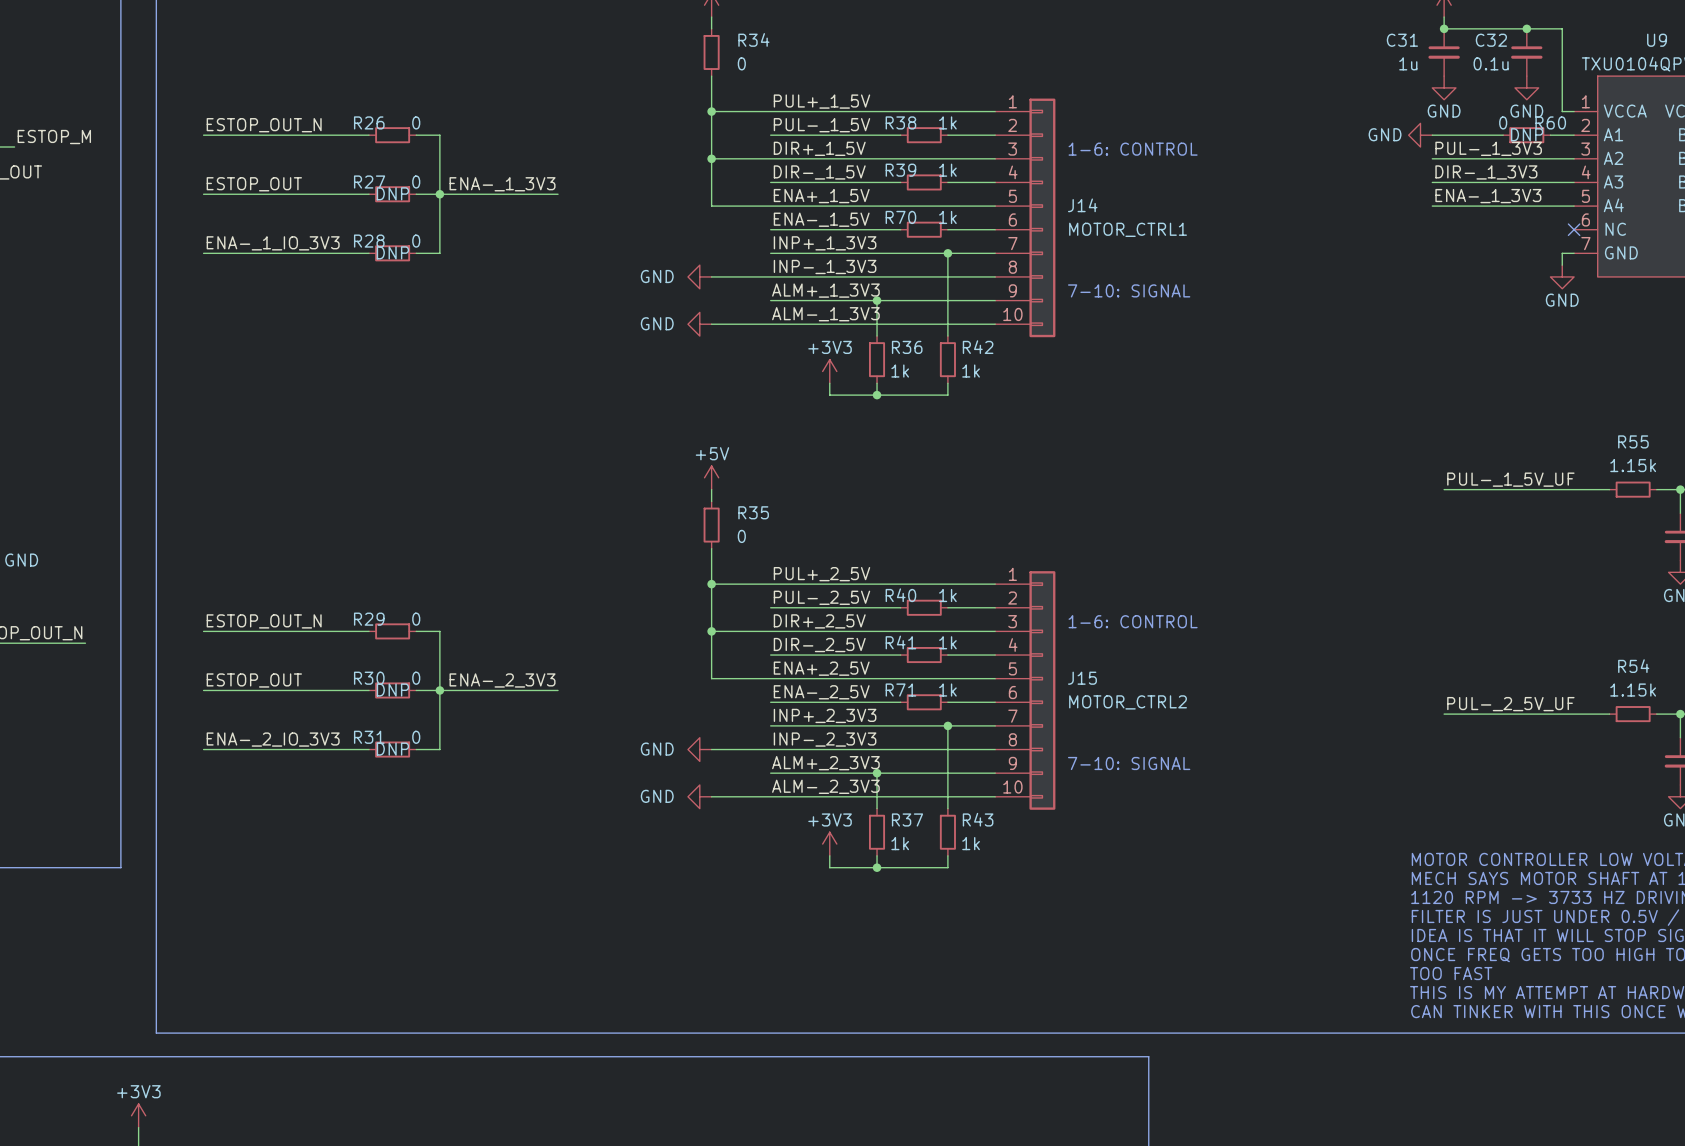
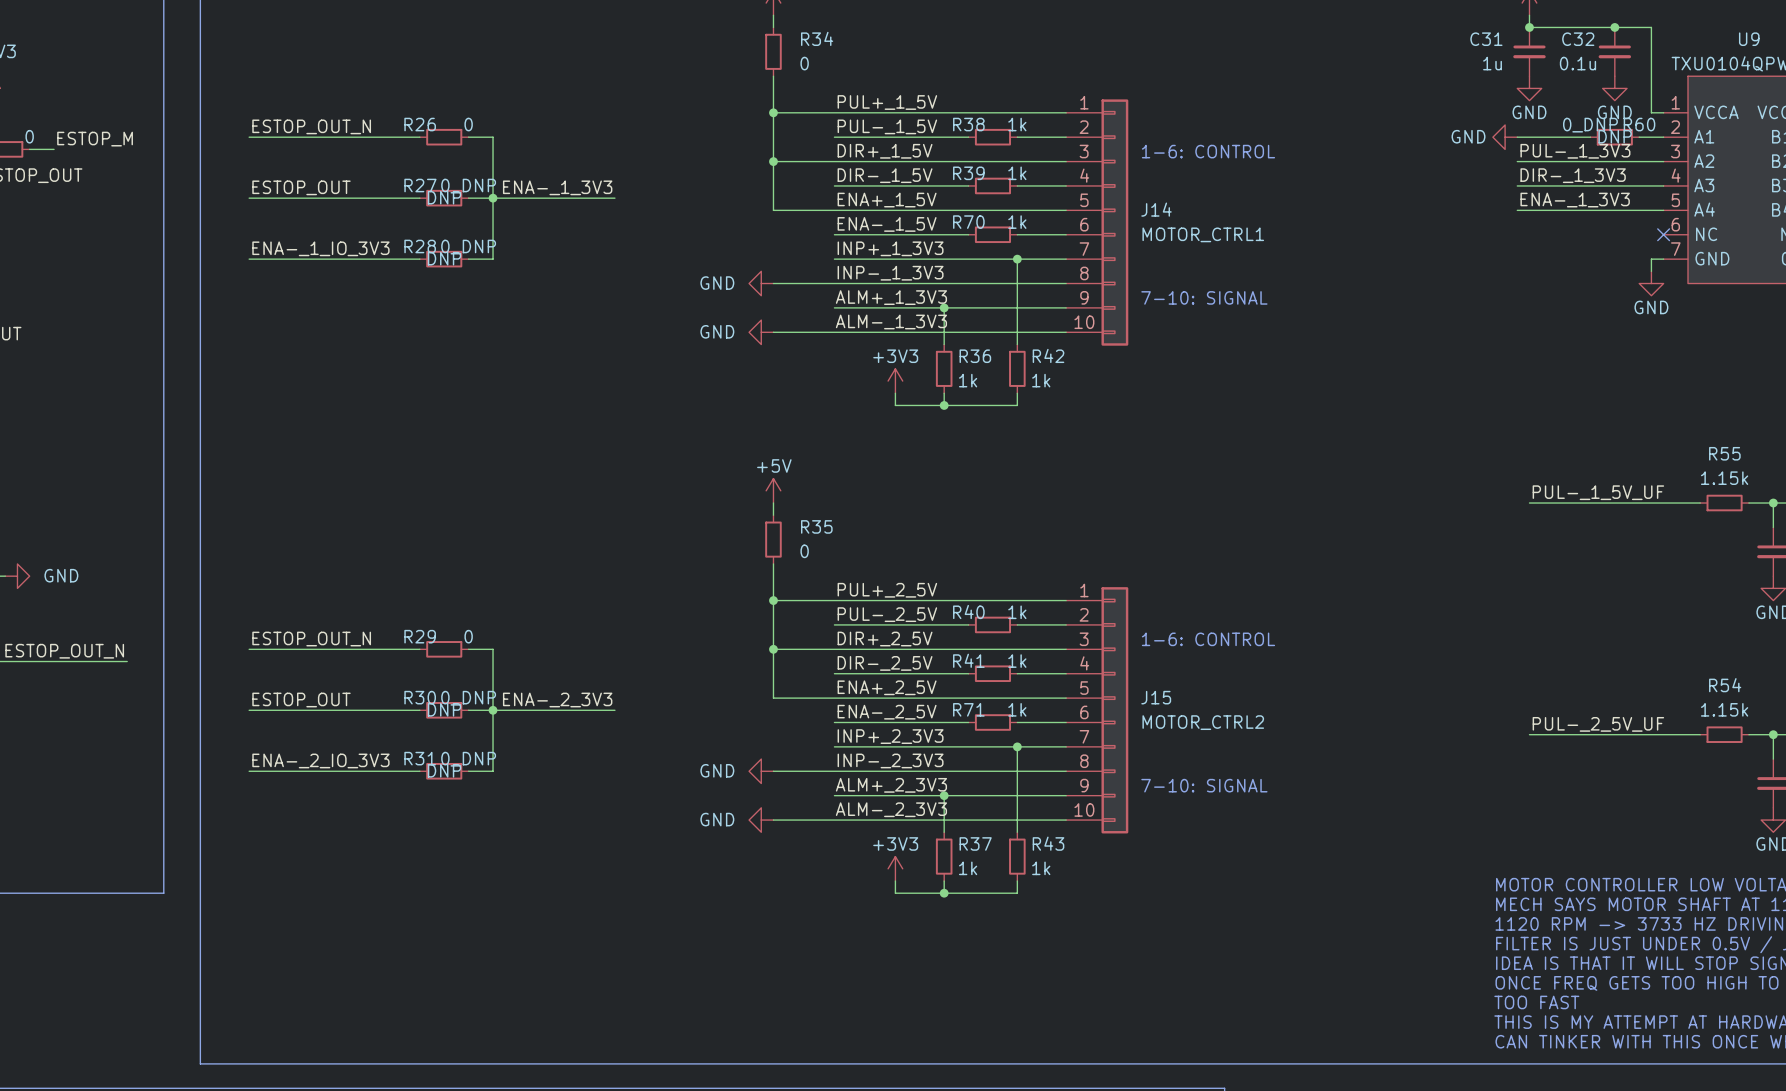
R60 value: 0 (1503, 122) -> 0_DNP (1590, 125)
R27 value: 0 (416, 182) -> 0_DNP (468, 186)
R28 value: 0 (416, 241) -> 0_DNP (468, 247)
R30 value: 0 (416, 678) -> 0_DNP (468, 698)
R31 value: 0 (416, 737) -> 0_DNP (468, 759)

